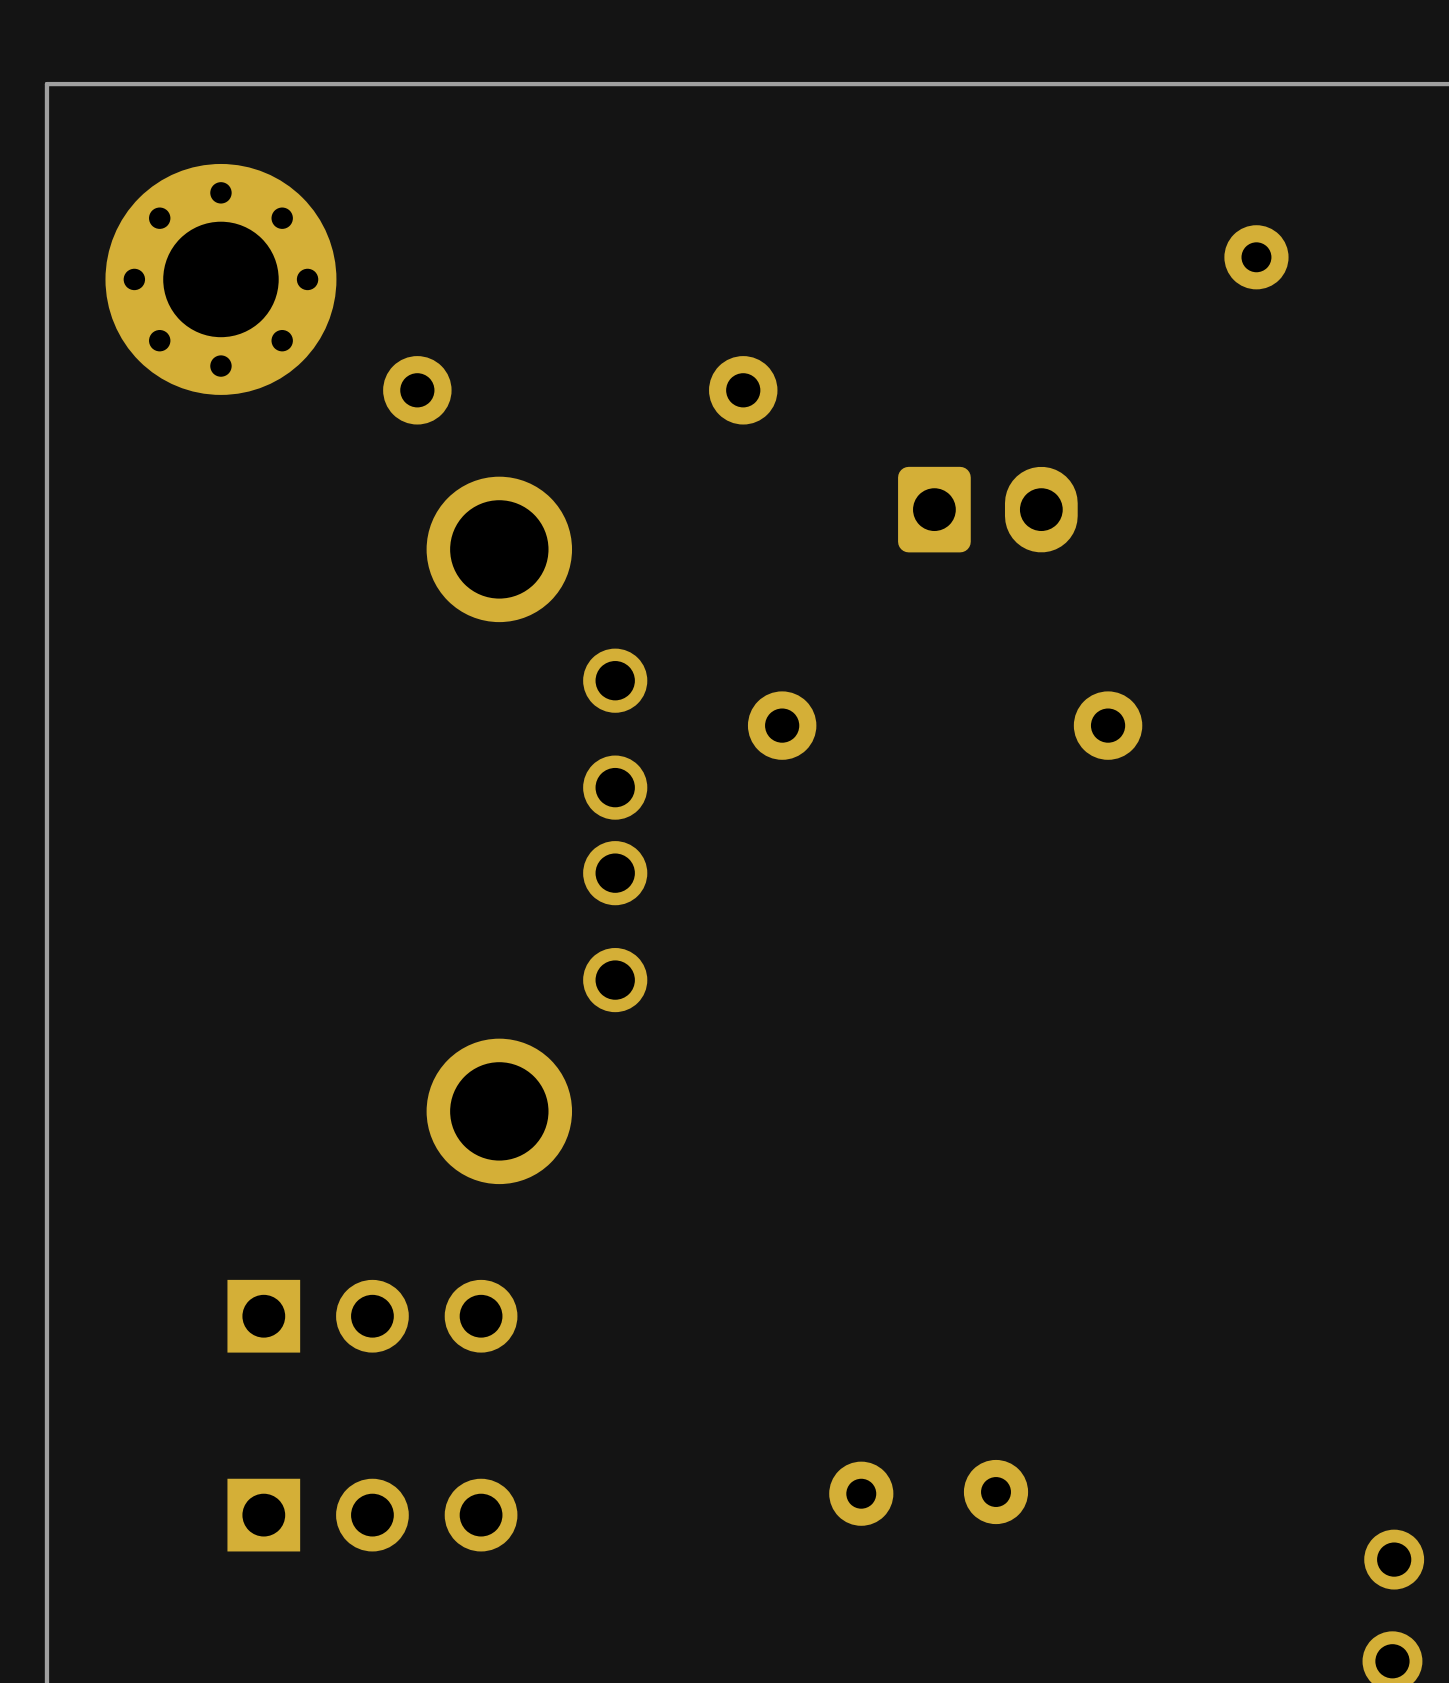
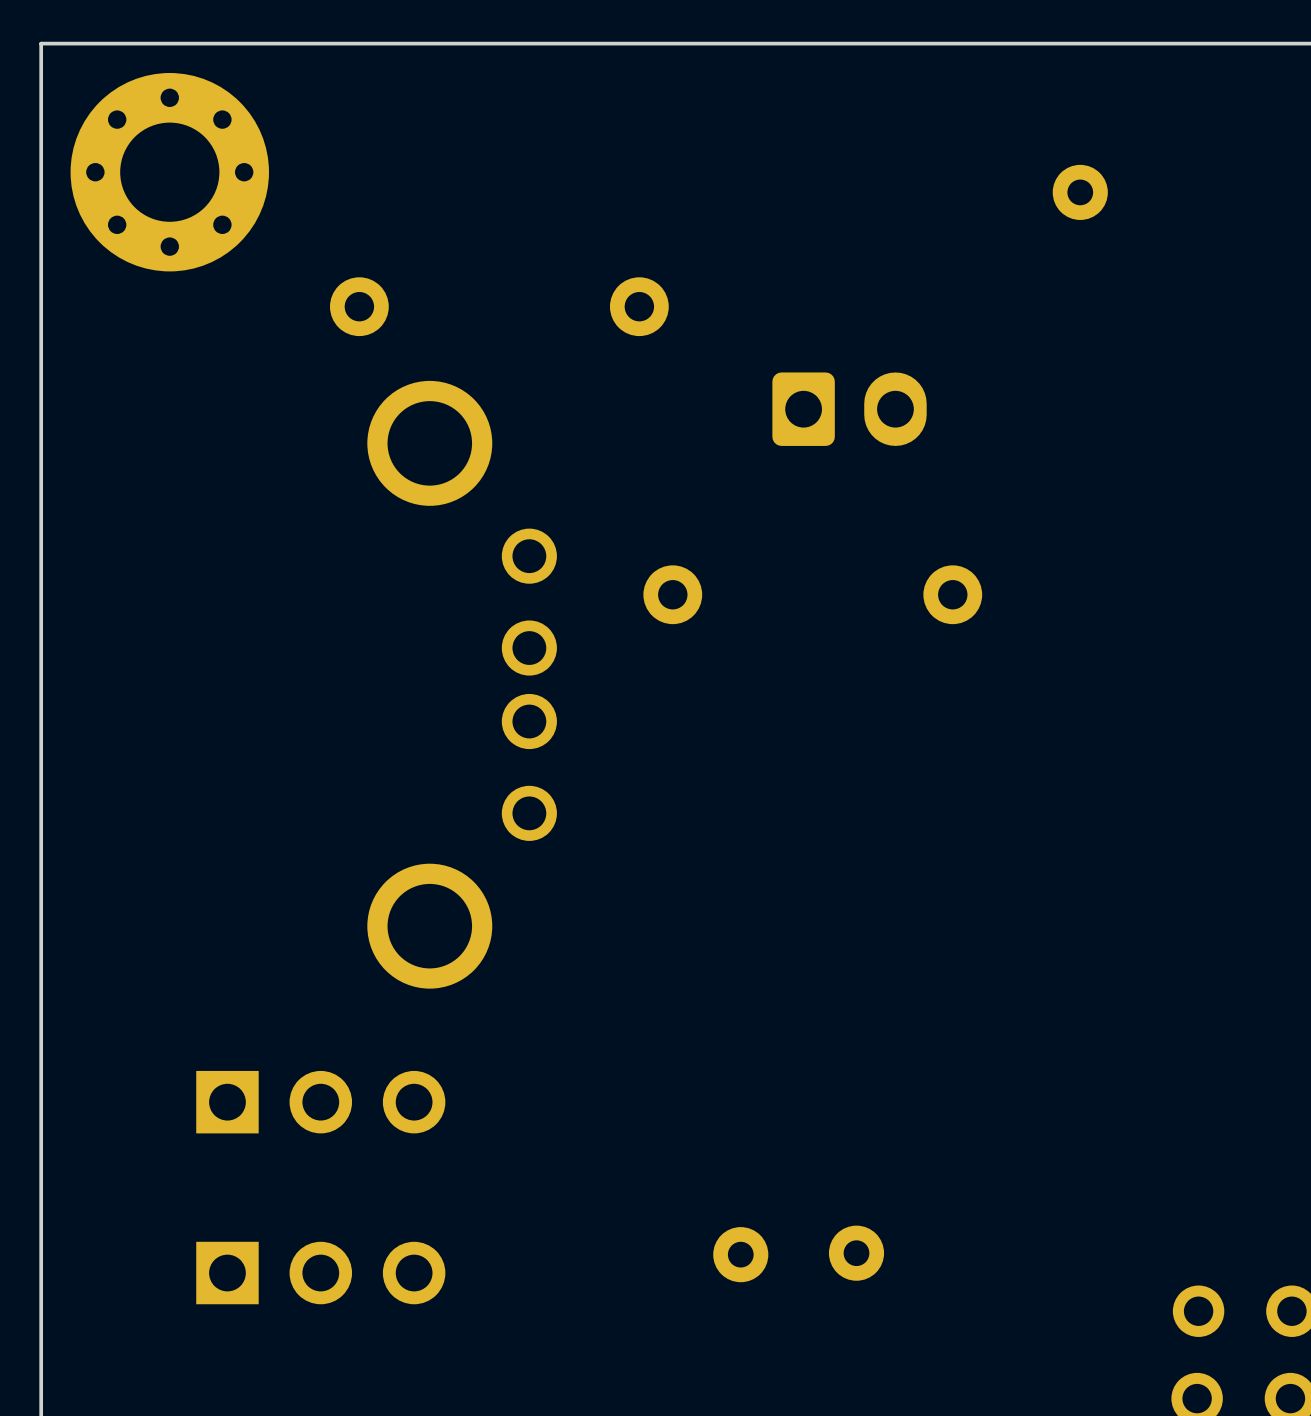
part position: (220, 279) -> (169, 172)

